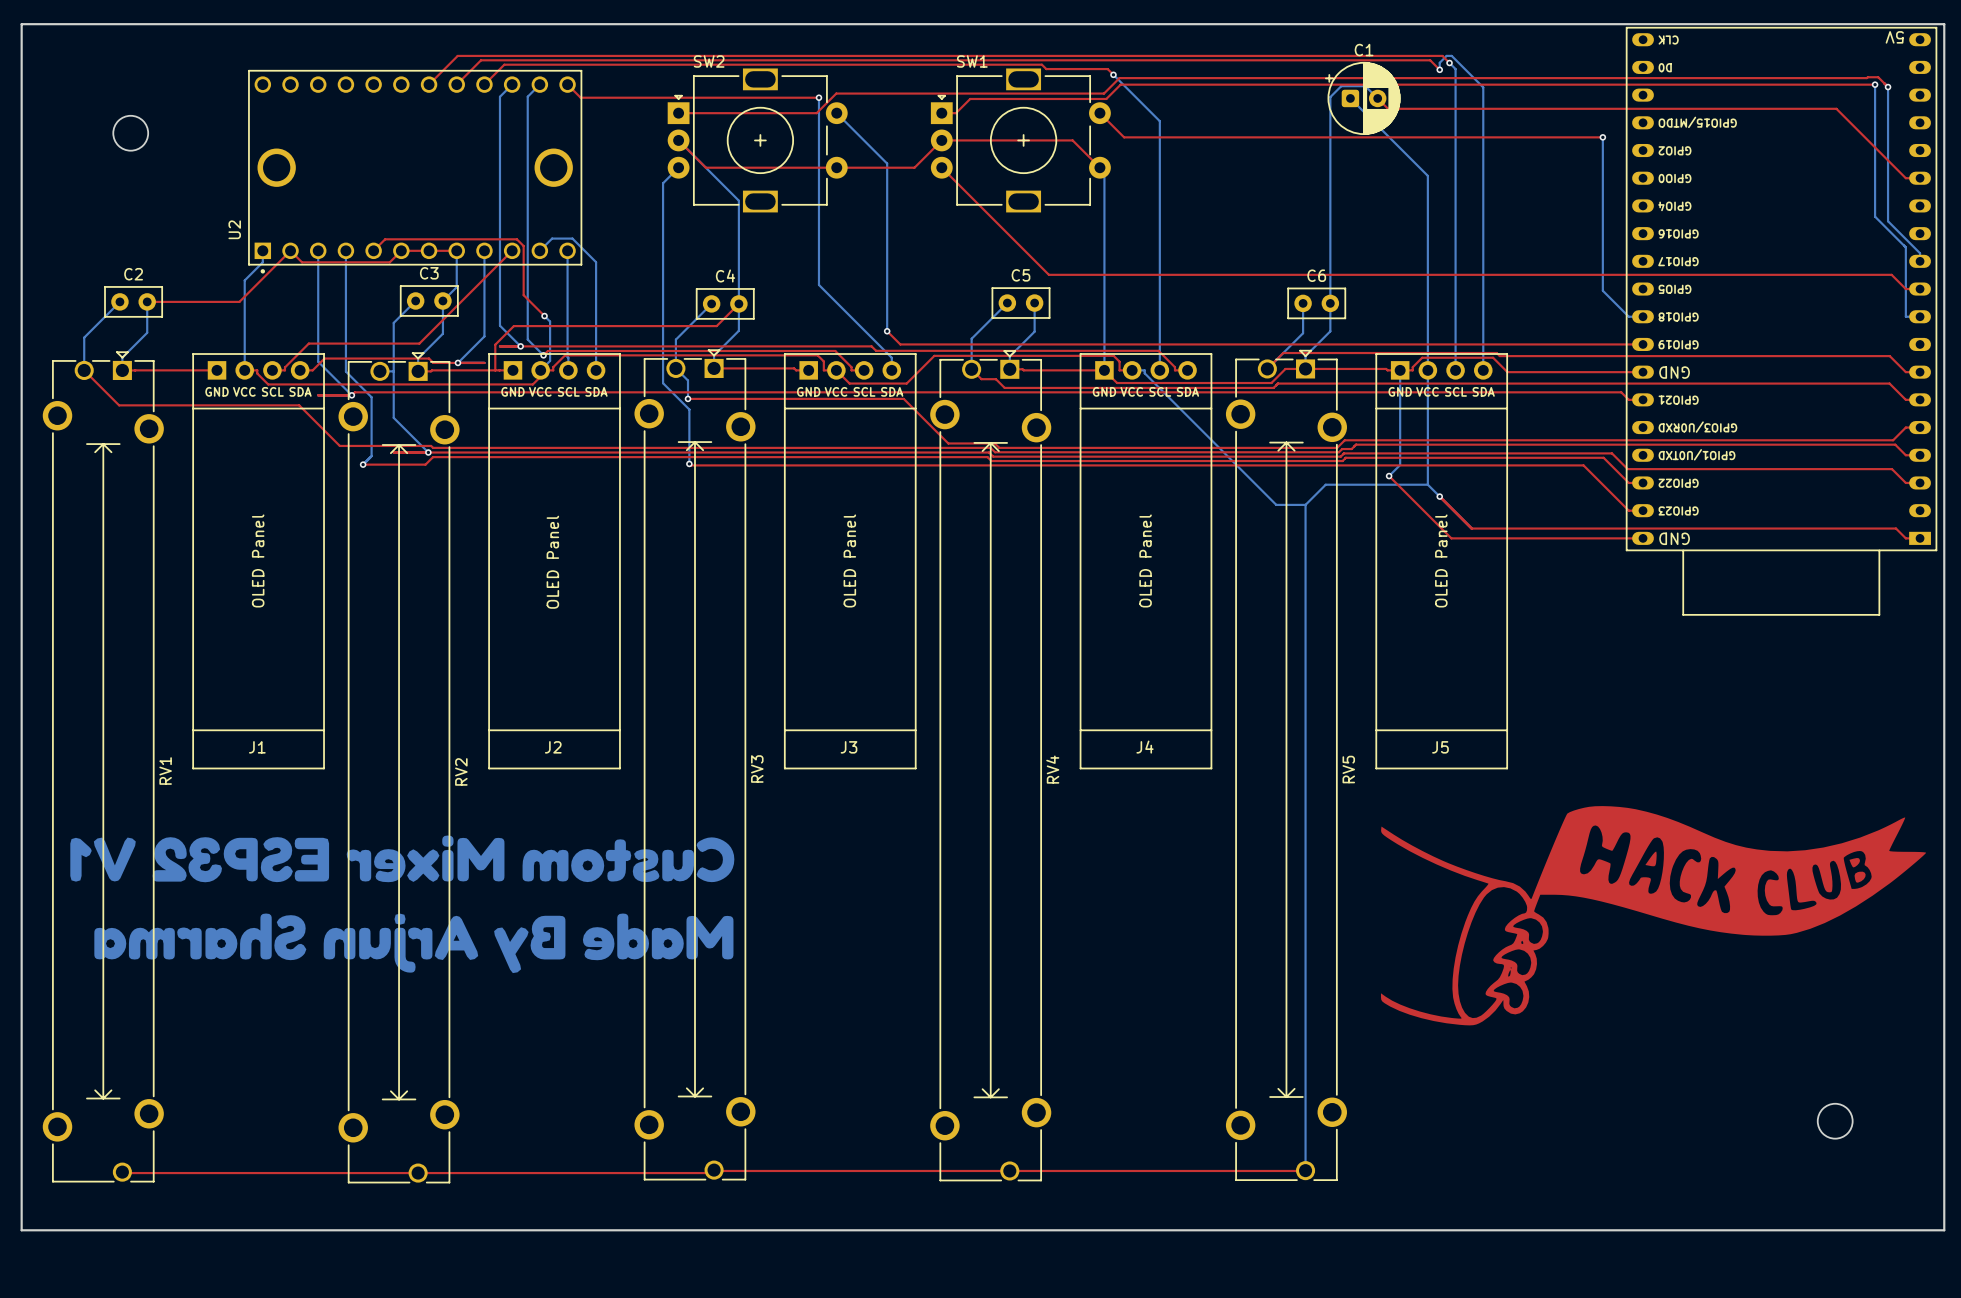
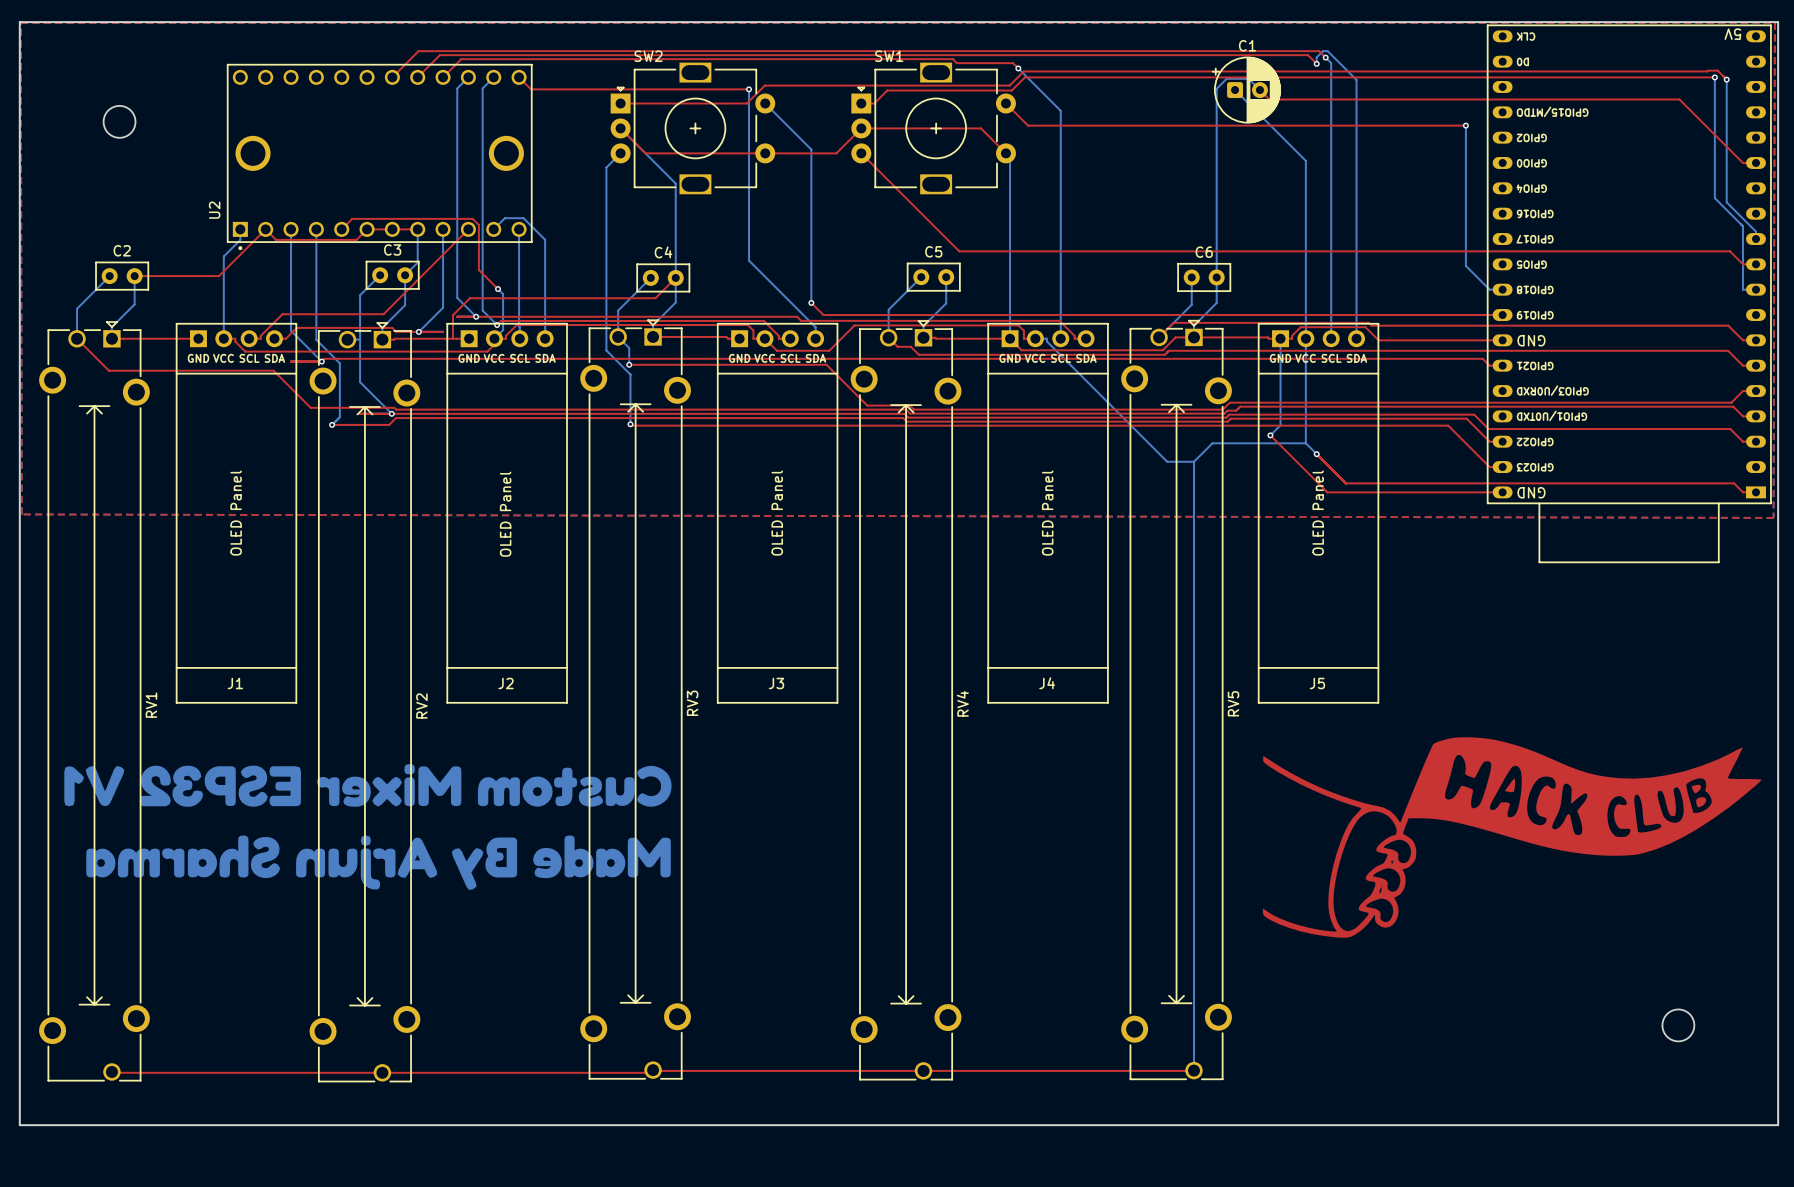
top zone outline: none -> (20, 22) (21, 514) (1773, 517) (1774, 22) (20, 22)

